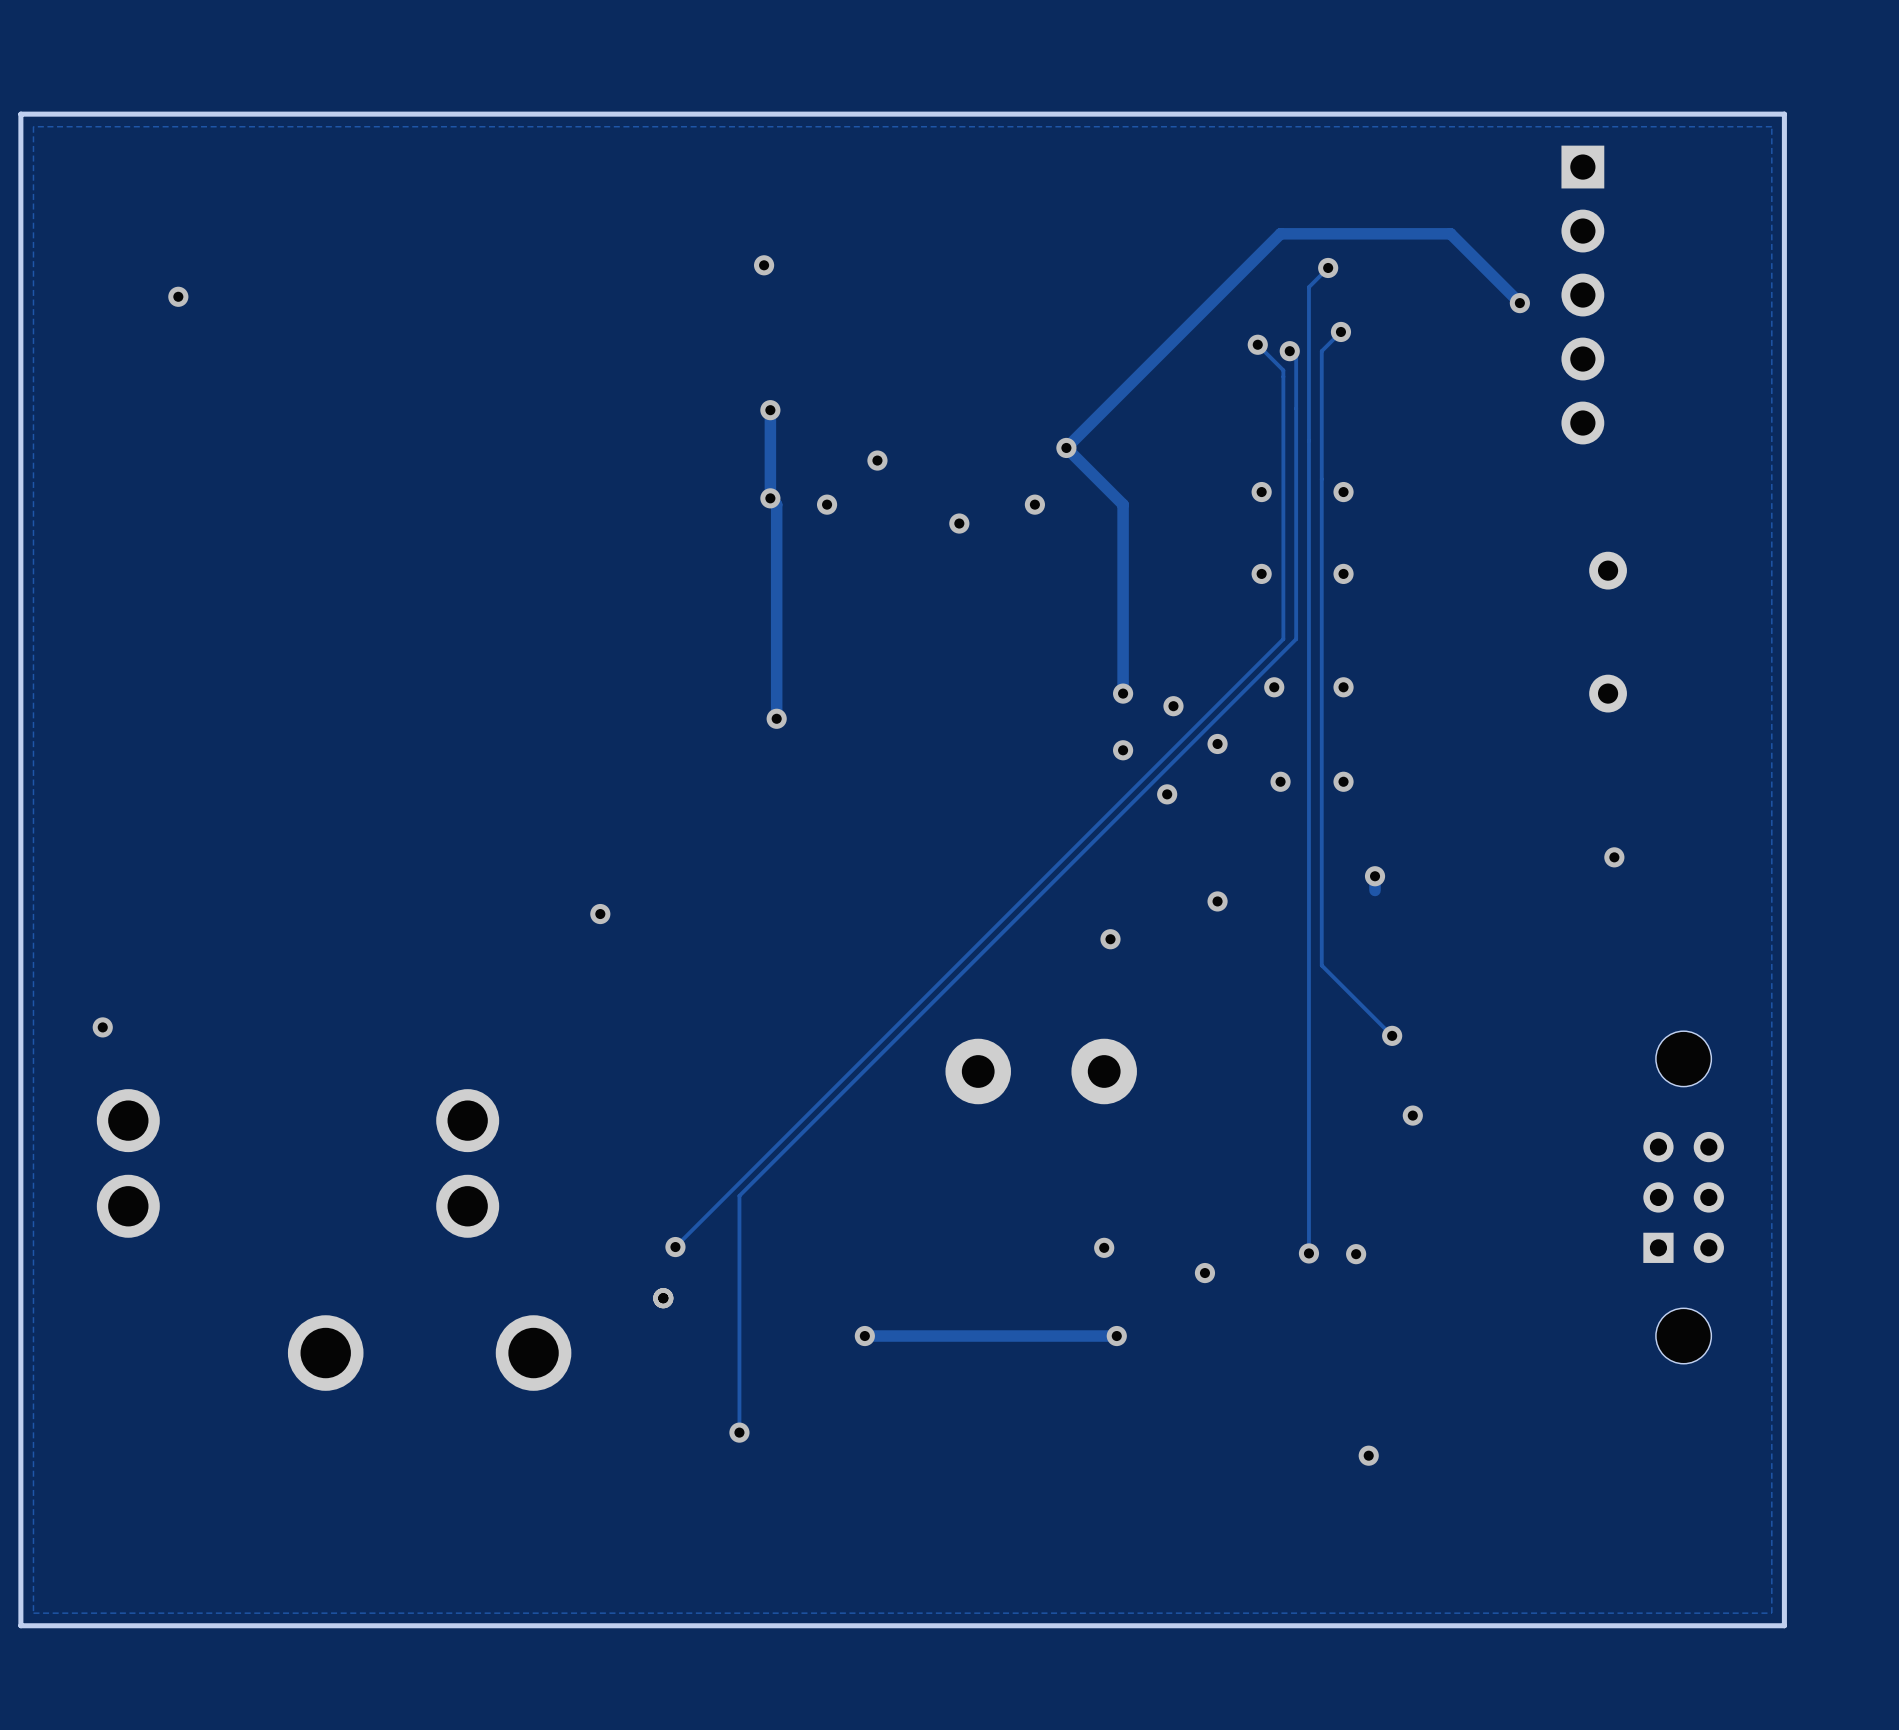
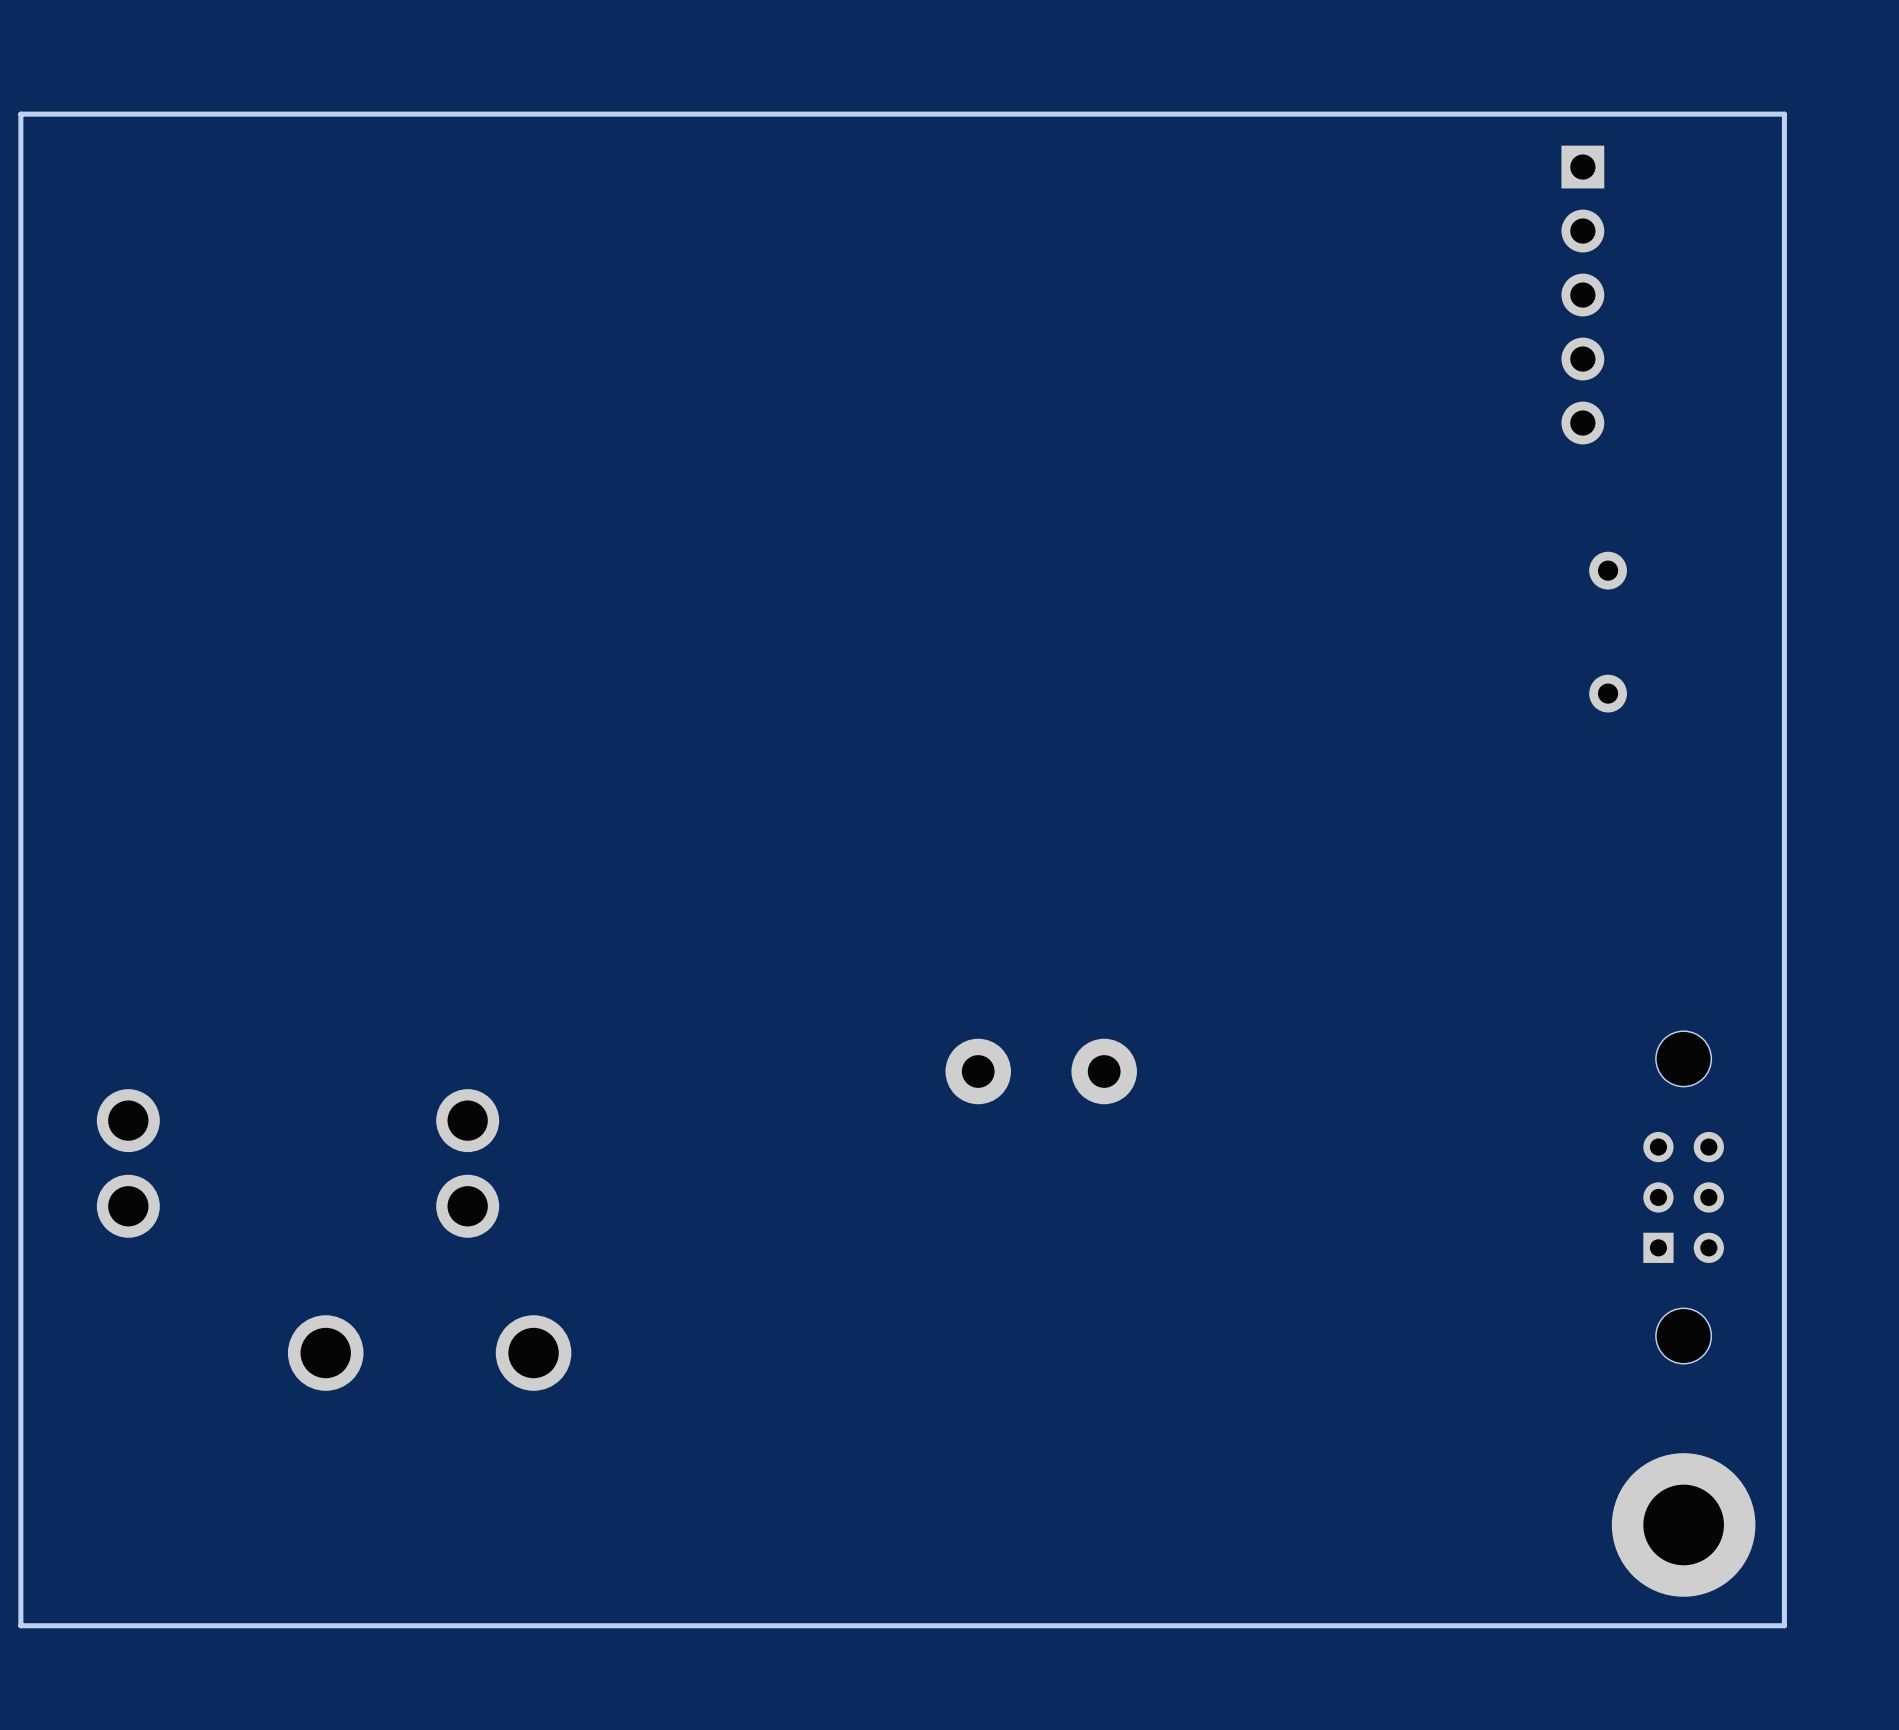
zone outline: (1771, 126) (33, 126) (33, 1613) (1771, 1613) (1771, 126) -> none
via: (764, 265) -> none
track: (1328, 267) (1308, 287) (1308, 1253) -> none
via: (1328, 267) -> none
via: (178, 296) -> none
track: (1519, 303) (1450, 233) (1280, 233) (1066, 447) (1123, 504) (1123, 693) -> none
via: (1519, 303) -> none
track: (1340, 331) (1321, 351) (1321, 965) (1392, 1035) -> none
via: (1340, 331) -> none
track: (1257, 344) (1283, 370) (1283, 639) (675, 1247) -> none
via: (1257, 344) -> none
track: (1289, 351) (1296, 357) (1296, 639) (739, 1195) (739, 1432) -> none
via: (1289, 351) -> none
track: (770, 410) (770, 498) (776, 504) (776, 718) -> none
via: (770, 410) -> none
via: (1066, 447) -> none
via: (877, 460) -> none
via: (1261, 492) -> none
via: (1343, 492) -> none
via: (770, 498) -> none
via: (827, 504) -> none
via: (1034, 504) -> none
via: (959, 523) -> none
via: (1261, 573) -> none
via: (1343, 573) -> none
via: (1274, 687) -> none
via: (1343, 687) -> none
via: (1123, 693) -> none
via: (1173, 706) -> none
via: (776, 718) -> none
via: (1217, 743) -> none
via: (1123, 750) -> none
via: (1280, 781) -> none
via: (1343, 781) -> none
via: (1167, 794) -> none
via: (1614, 857) -> none
track: (1375, 876) (1375, 890) -> none
via: (1375, 876) -> none
via: (1217, 901) -> none
via: (600, 914) -> none
via: (1110, 939) -> none
via: (102, 1027) -> none
via: (1392, 1035) -> none
via: (1412, 1115) -> none
via: (675, 1247) -> none
via: (1104, 1247) -> none
via: (1308, 1253) -> none
via: (1356, 1254) -> none
via: (1204, 1273) -> none
via: (663, 1298) -> none
via: (864, 1336) -> none
track: (1116, 1336) (864, 1336) -> none
via: (1116, 1336) -> none
via: (739, 1432) -> none
via: (1368, 1455) -> none
part: none -> (1683, 1524)

